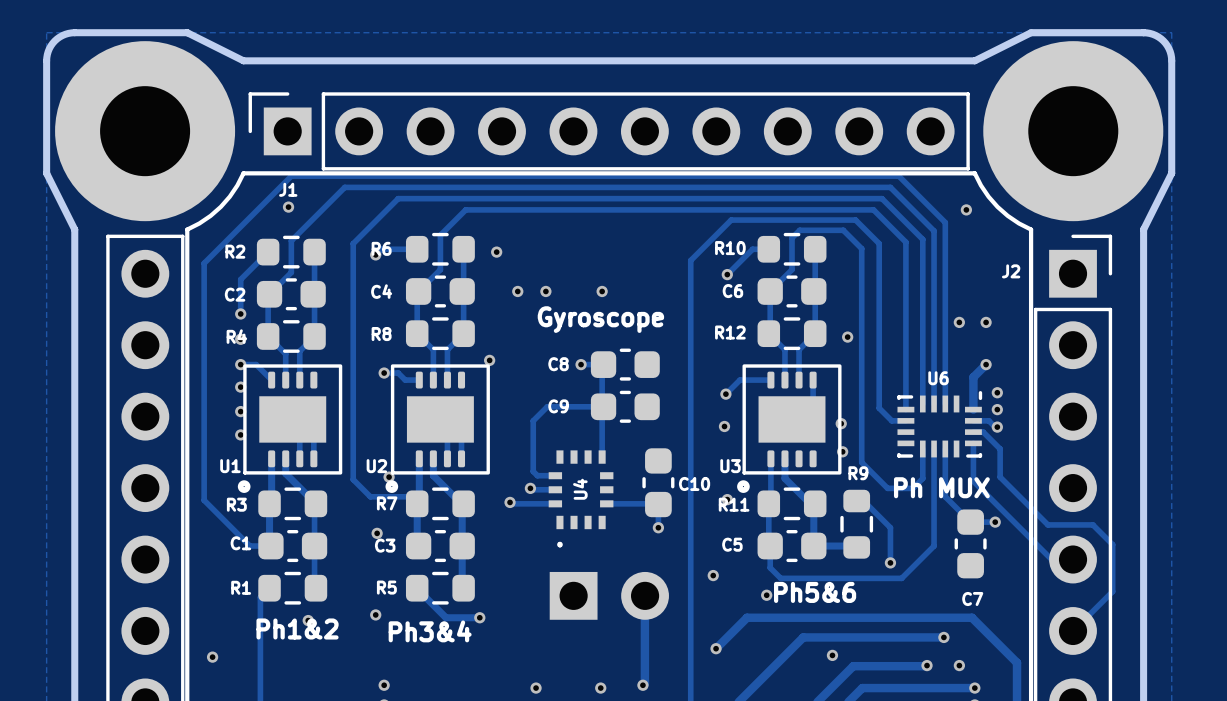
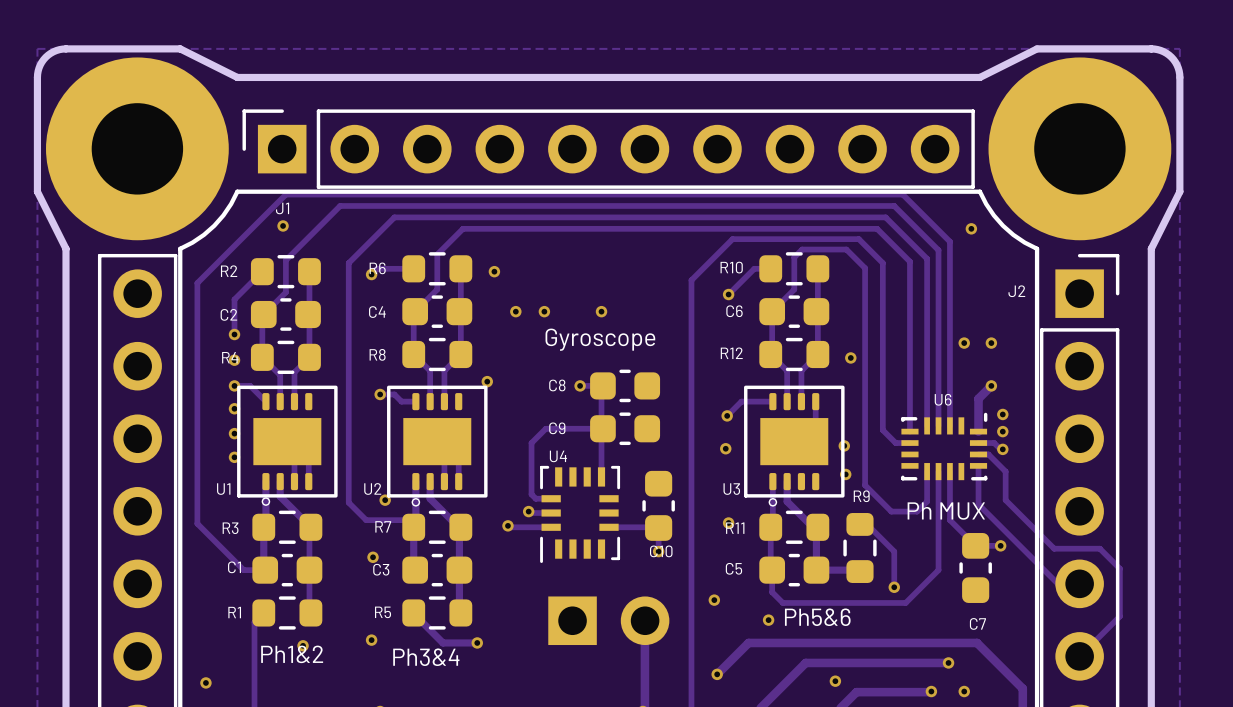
U1 footprint: [237, 364, 343, 493] -> [237, 385, 338, 506]
U2 footprint: [385, 364, 490, 493] -> [387, 385, 488, 507]
U3 footprint: [737, 364, 842, 493] -> [744, 385, 845, 507]
U4 footprint: [548, 450, 614, 548] -> [540, 465, 621, 563]
C10 name position: C10 (694, 483) -> C10 (661, 551)

